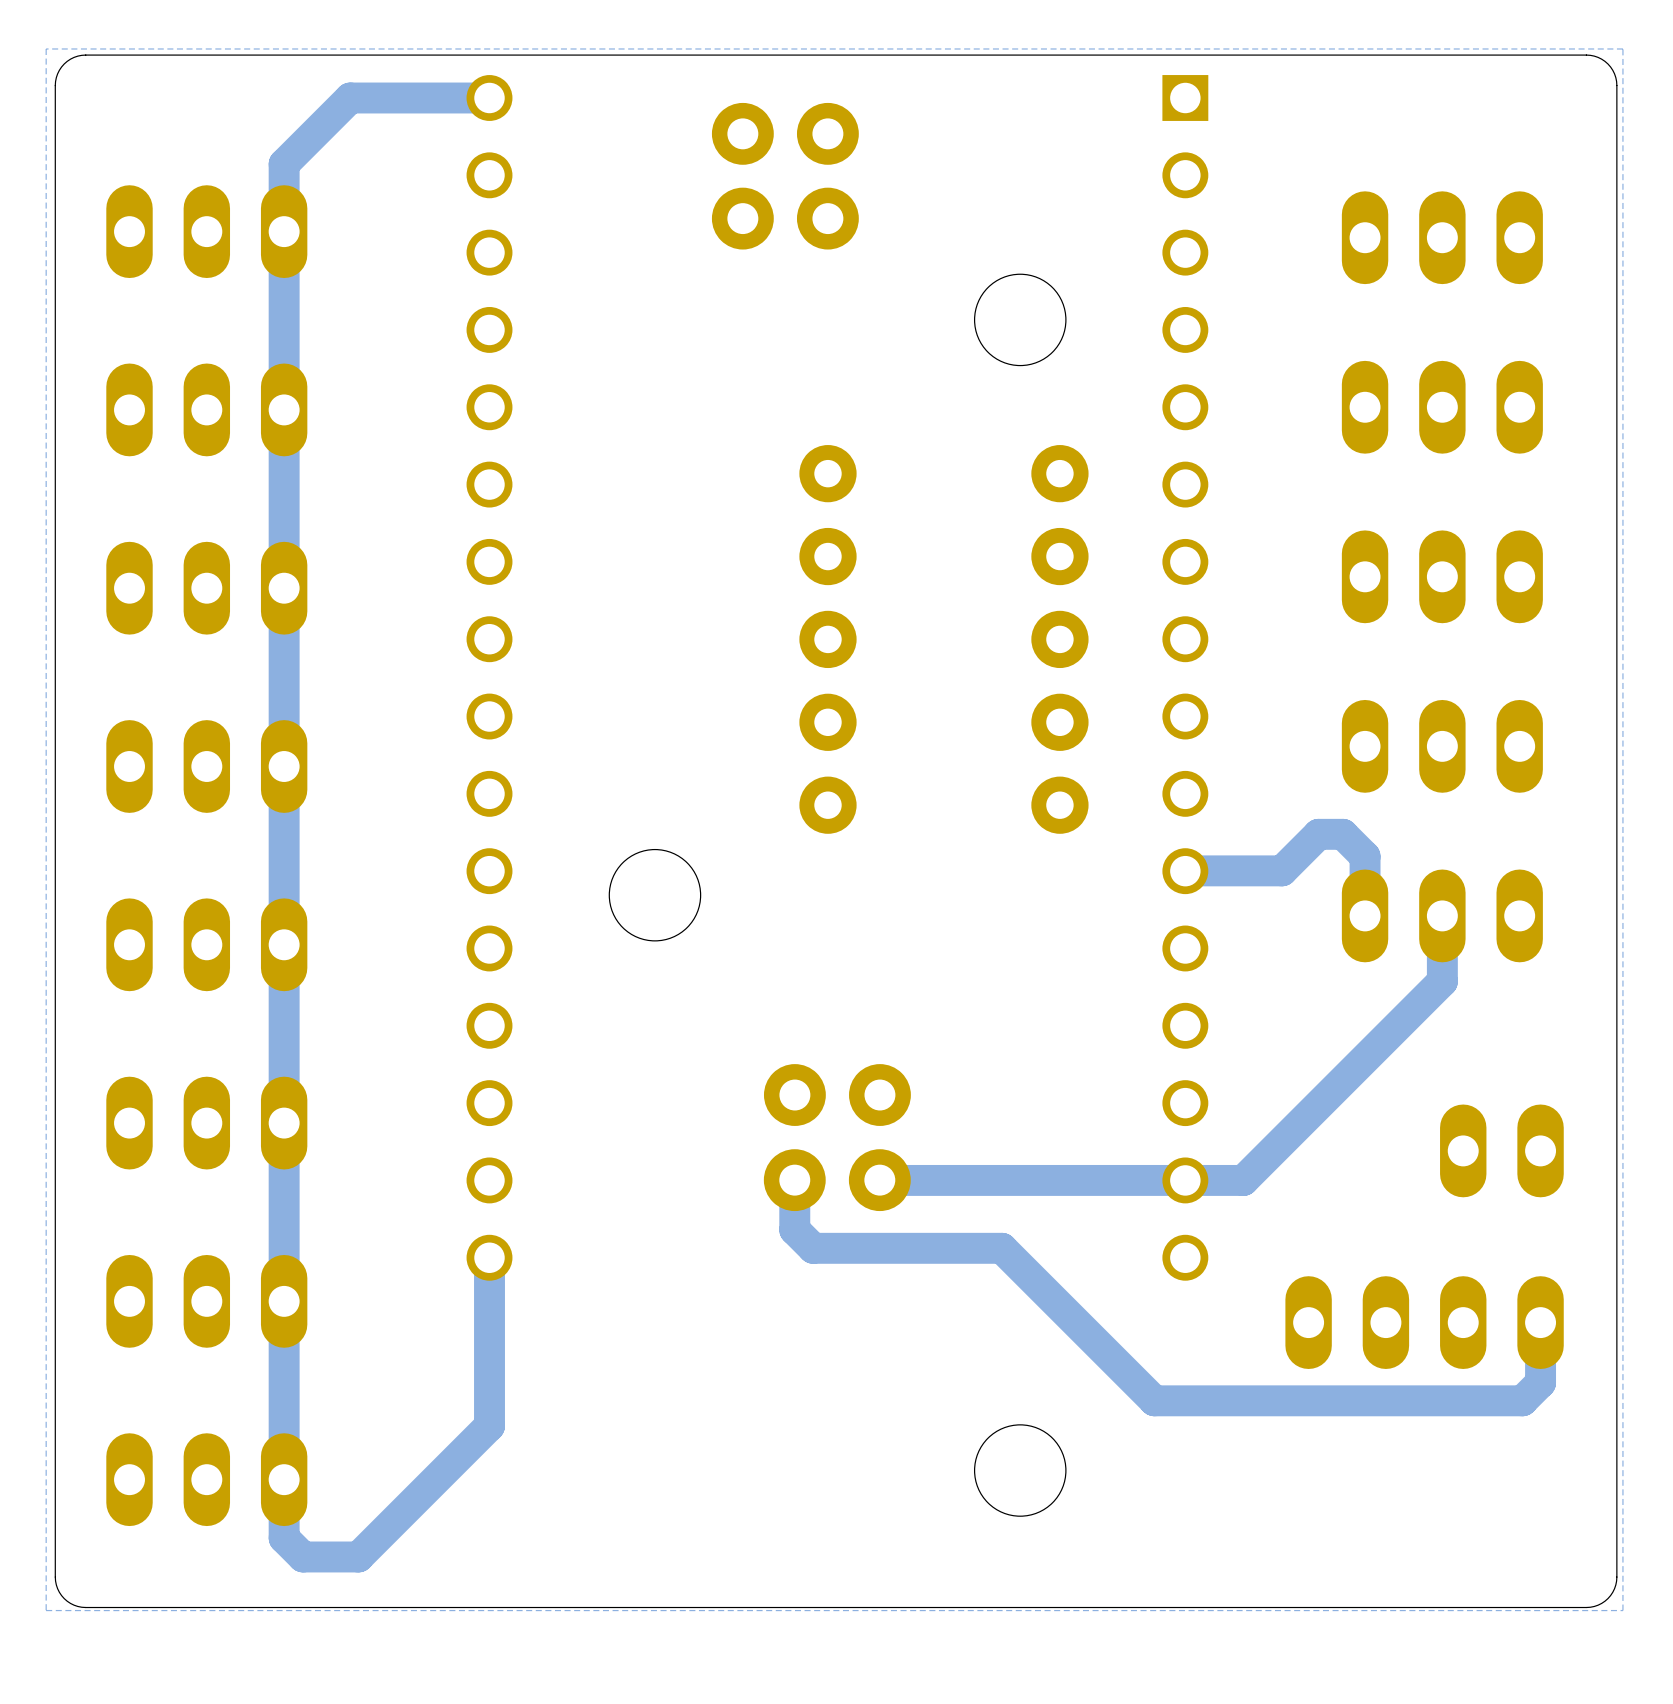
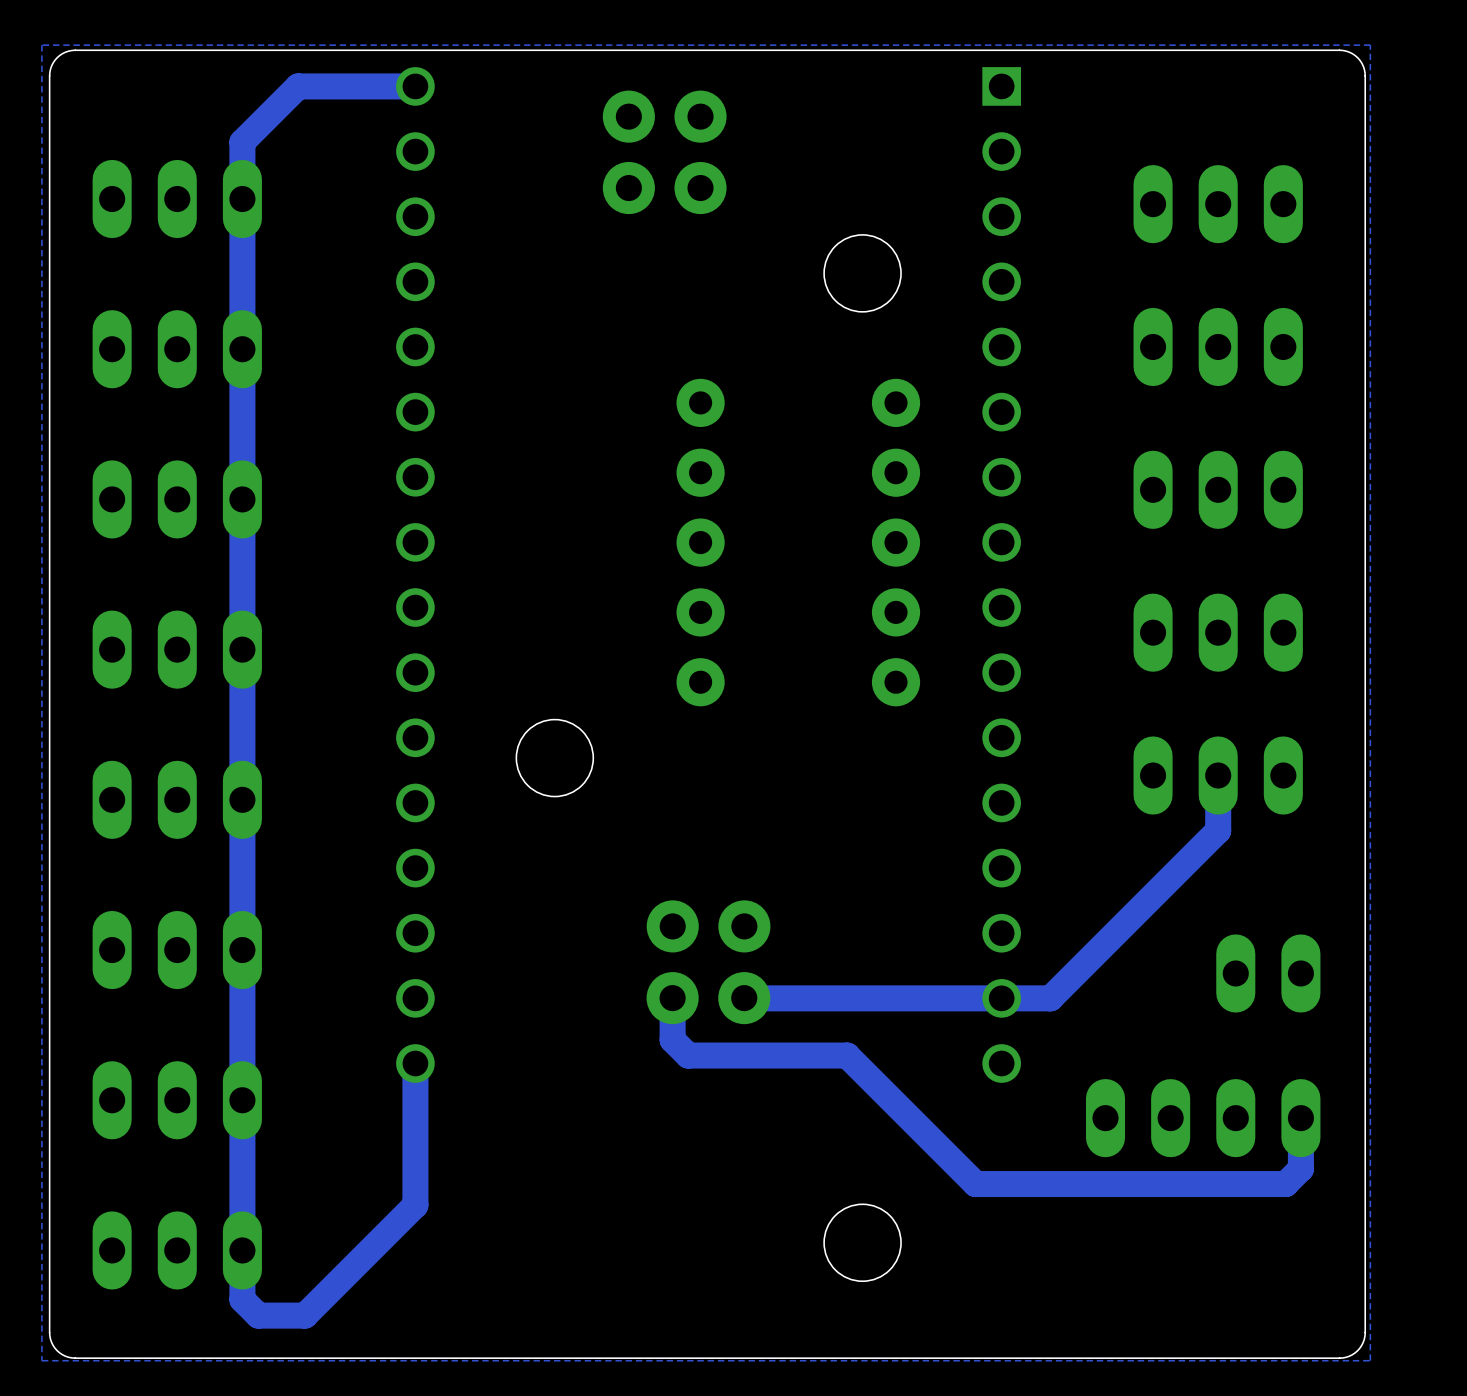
track: (1185, 870) (1282, 870) (1318, 834) (1342, 834) (1365, 856) (1365, 915) -> none

